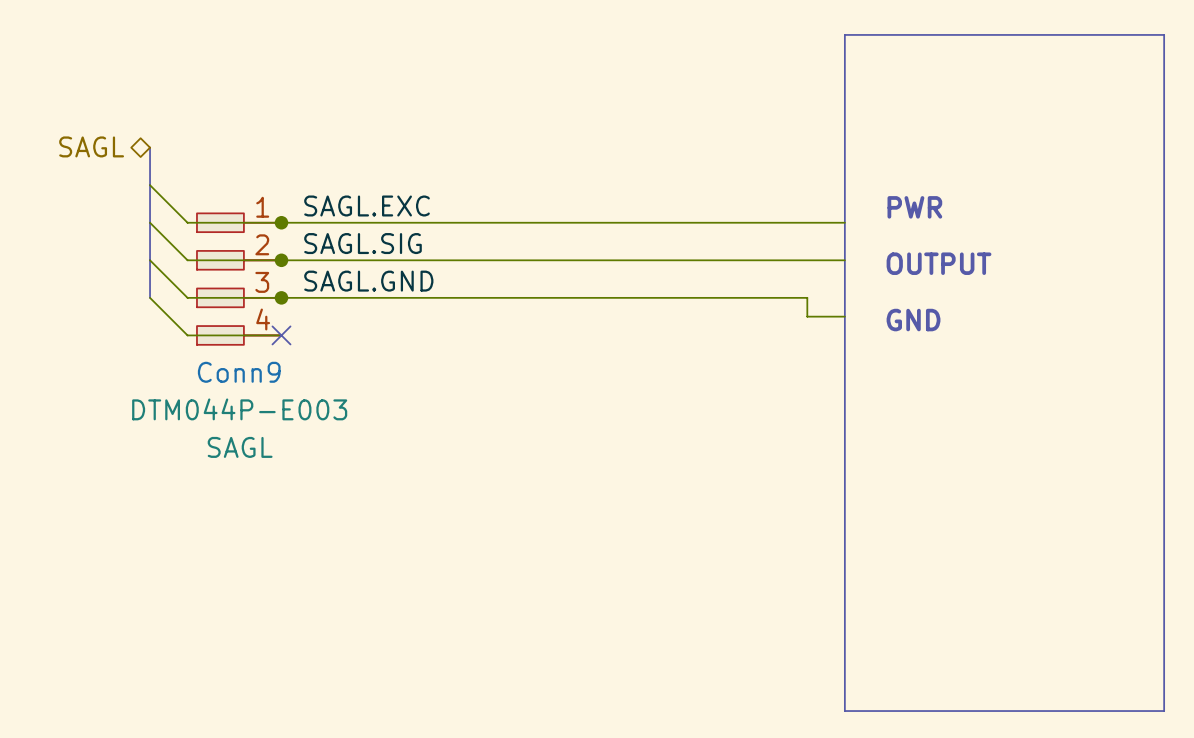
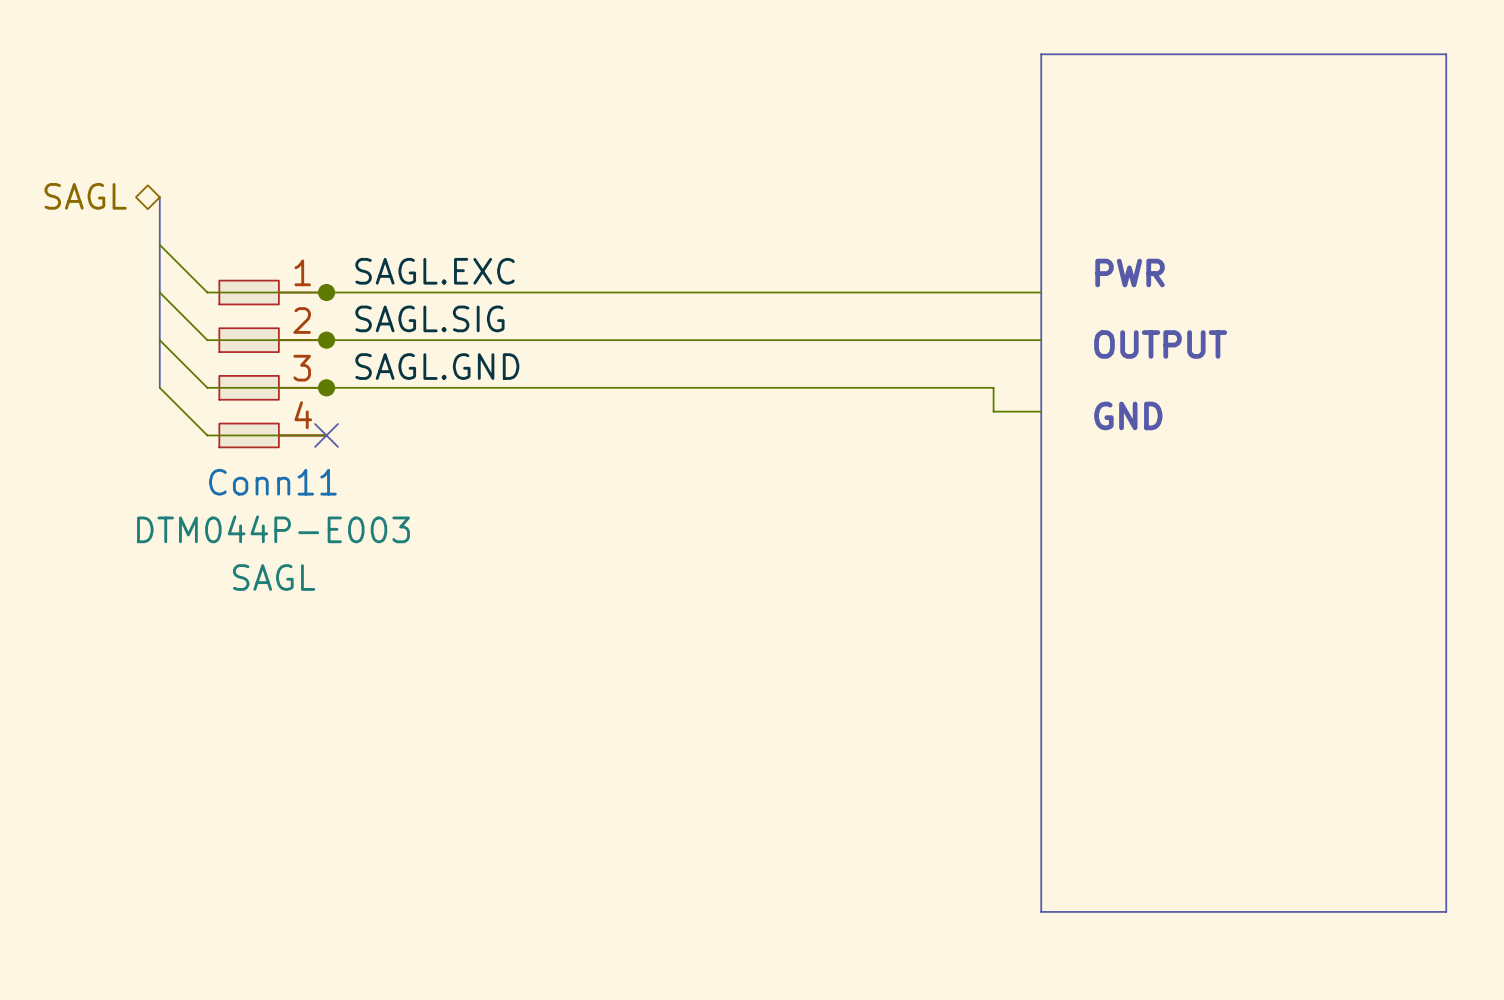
Conn9 name: Conn9 (239, 372) -> Conn11 (272, 482)

